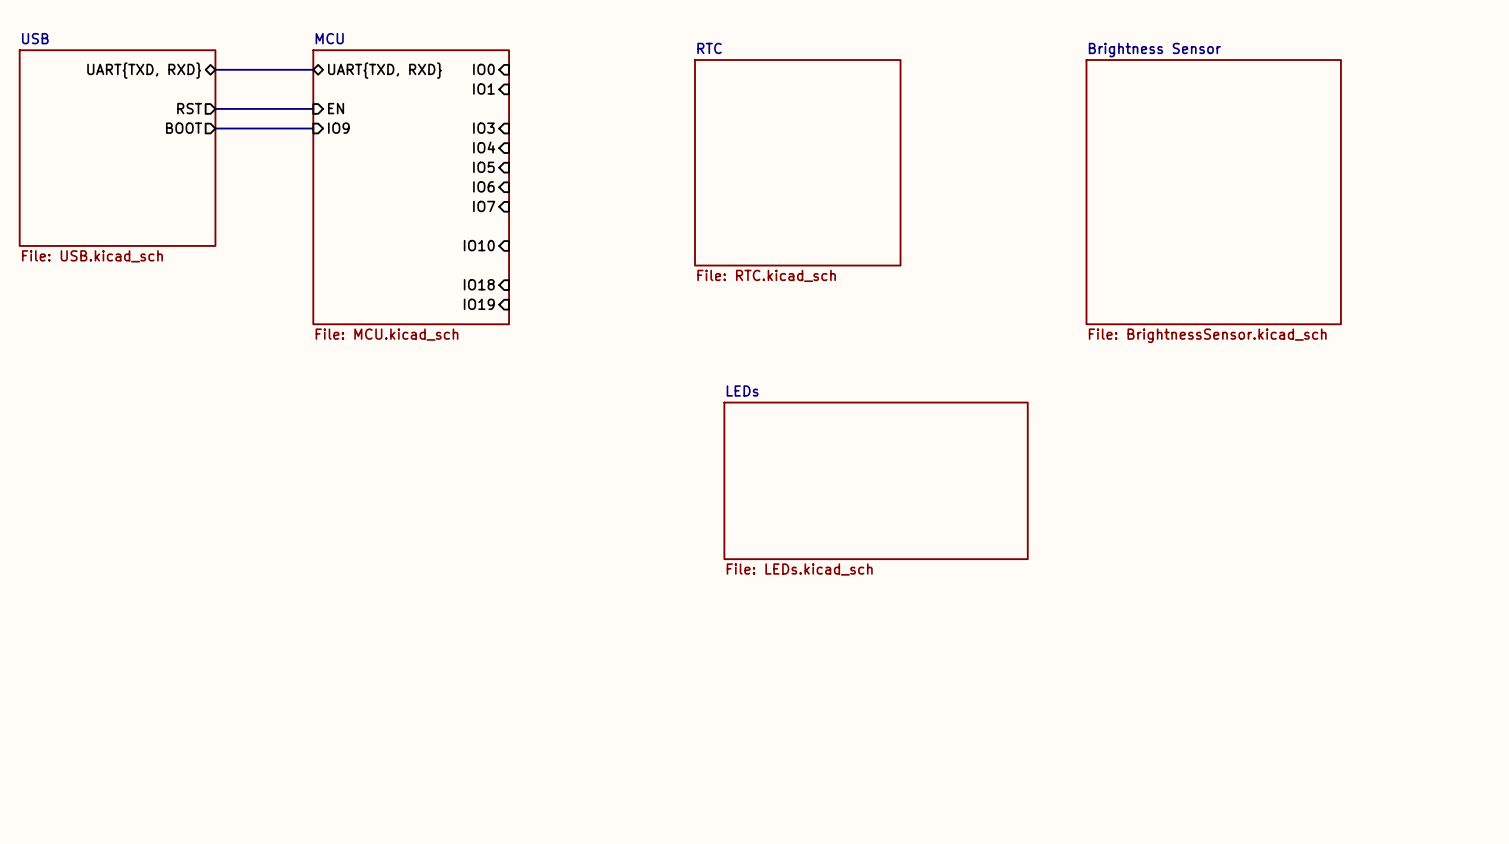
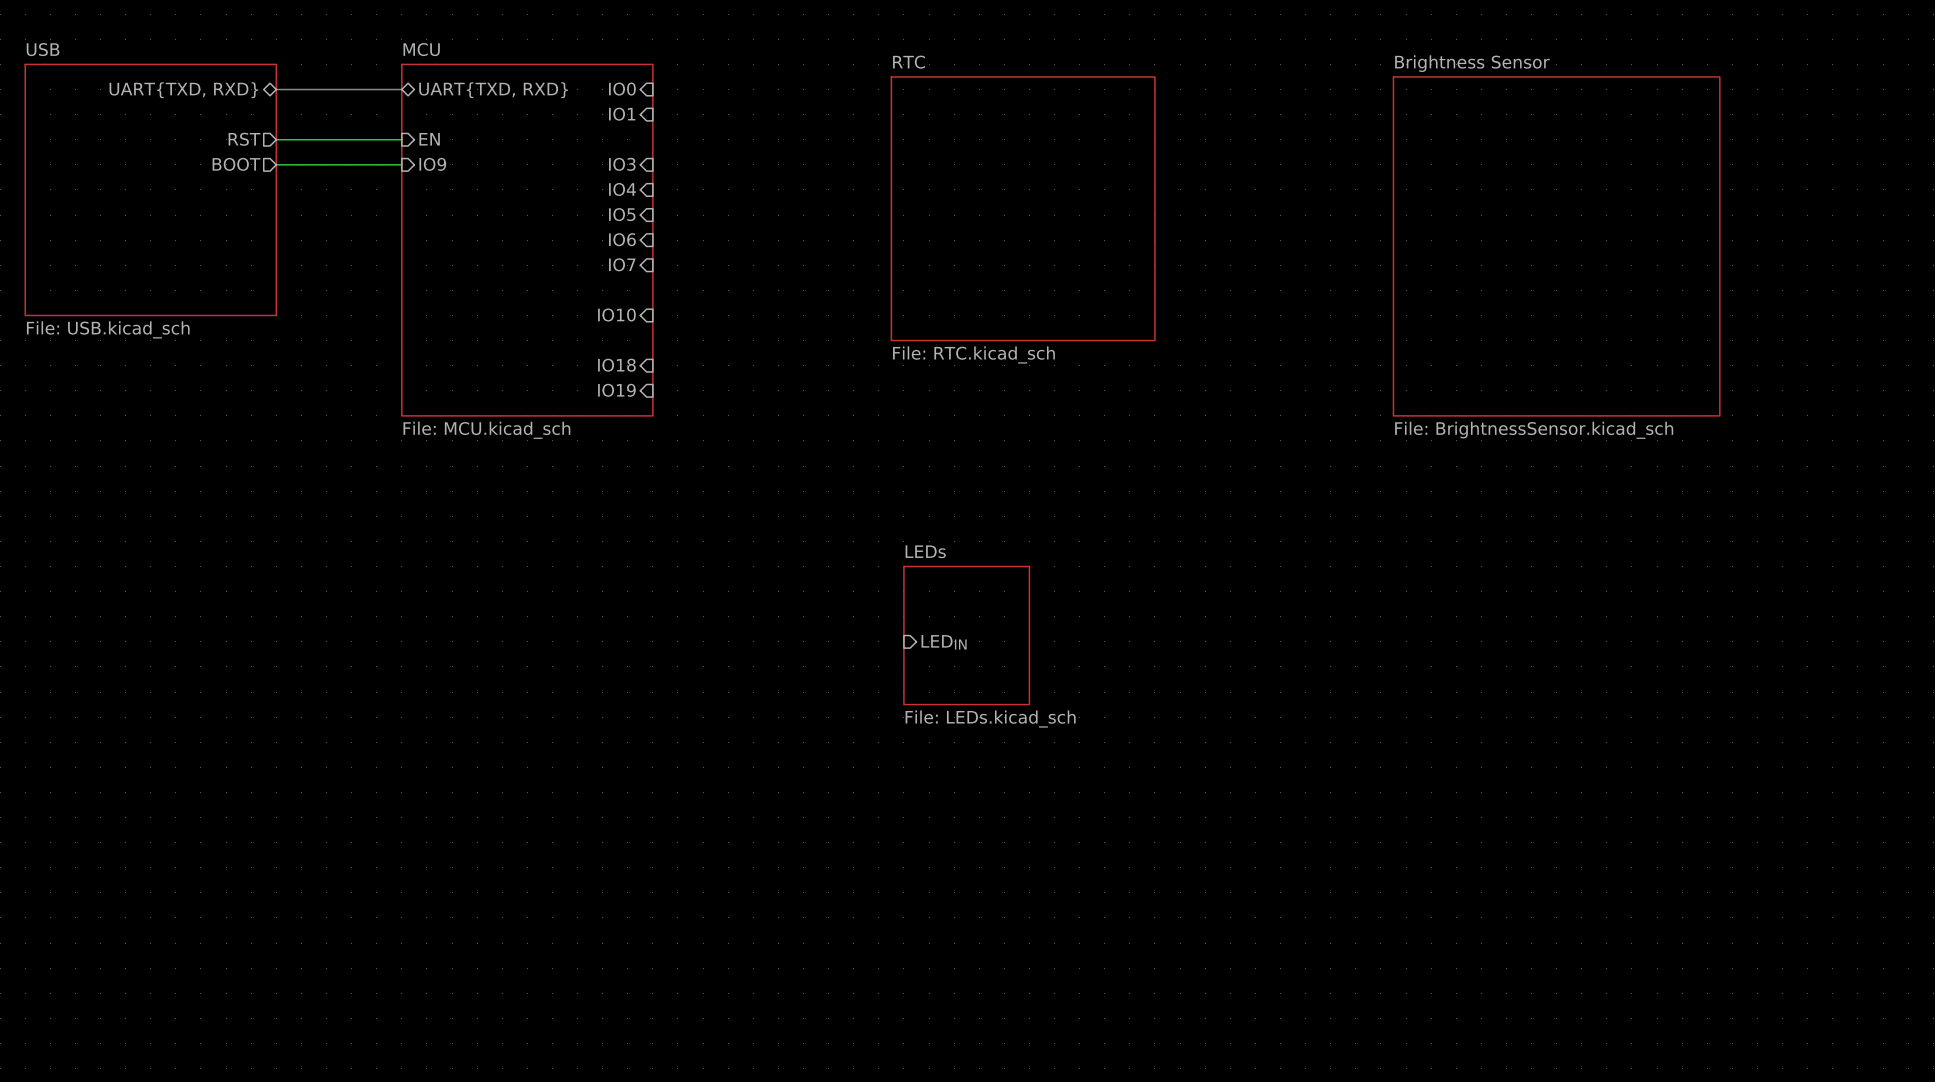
sheet LEDs: File: LEDs.kicad_sch (876, 480) -> none
sheet LEDs: none -> File: LEDs.kicad_sch (966, 635)
sheet pin: none -> LEDIN (944, 642)

